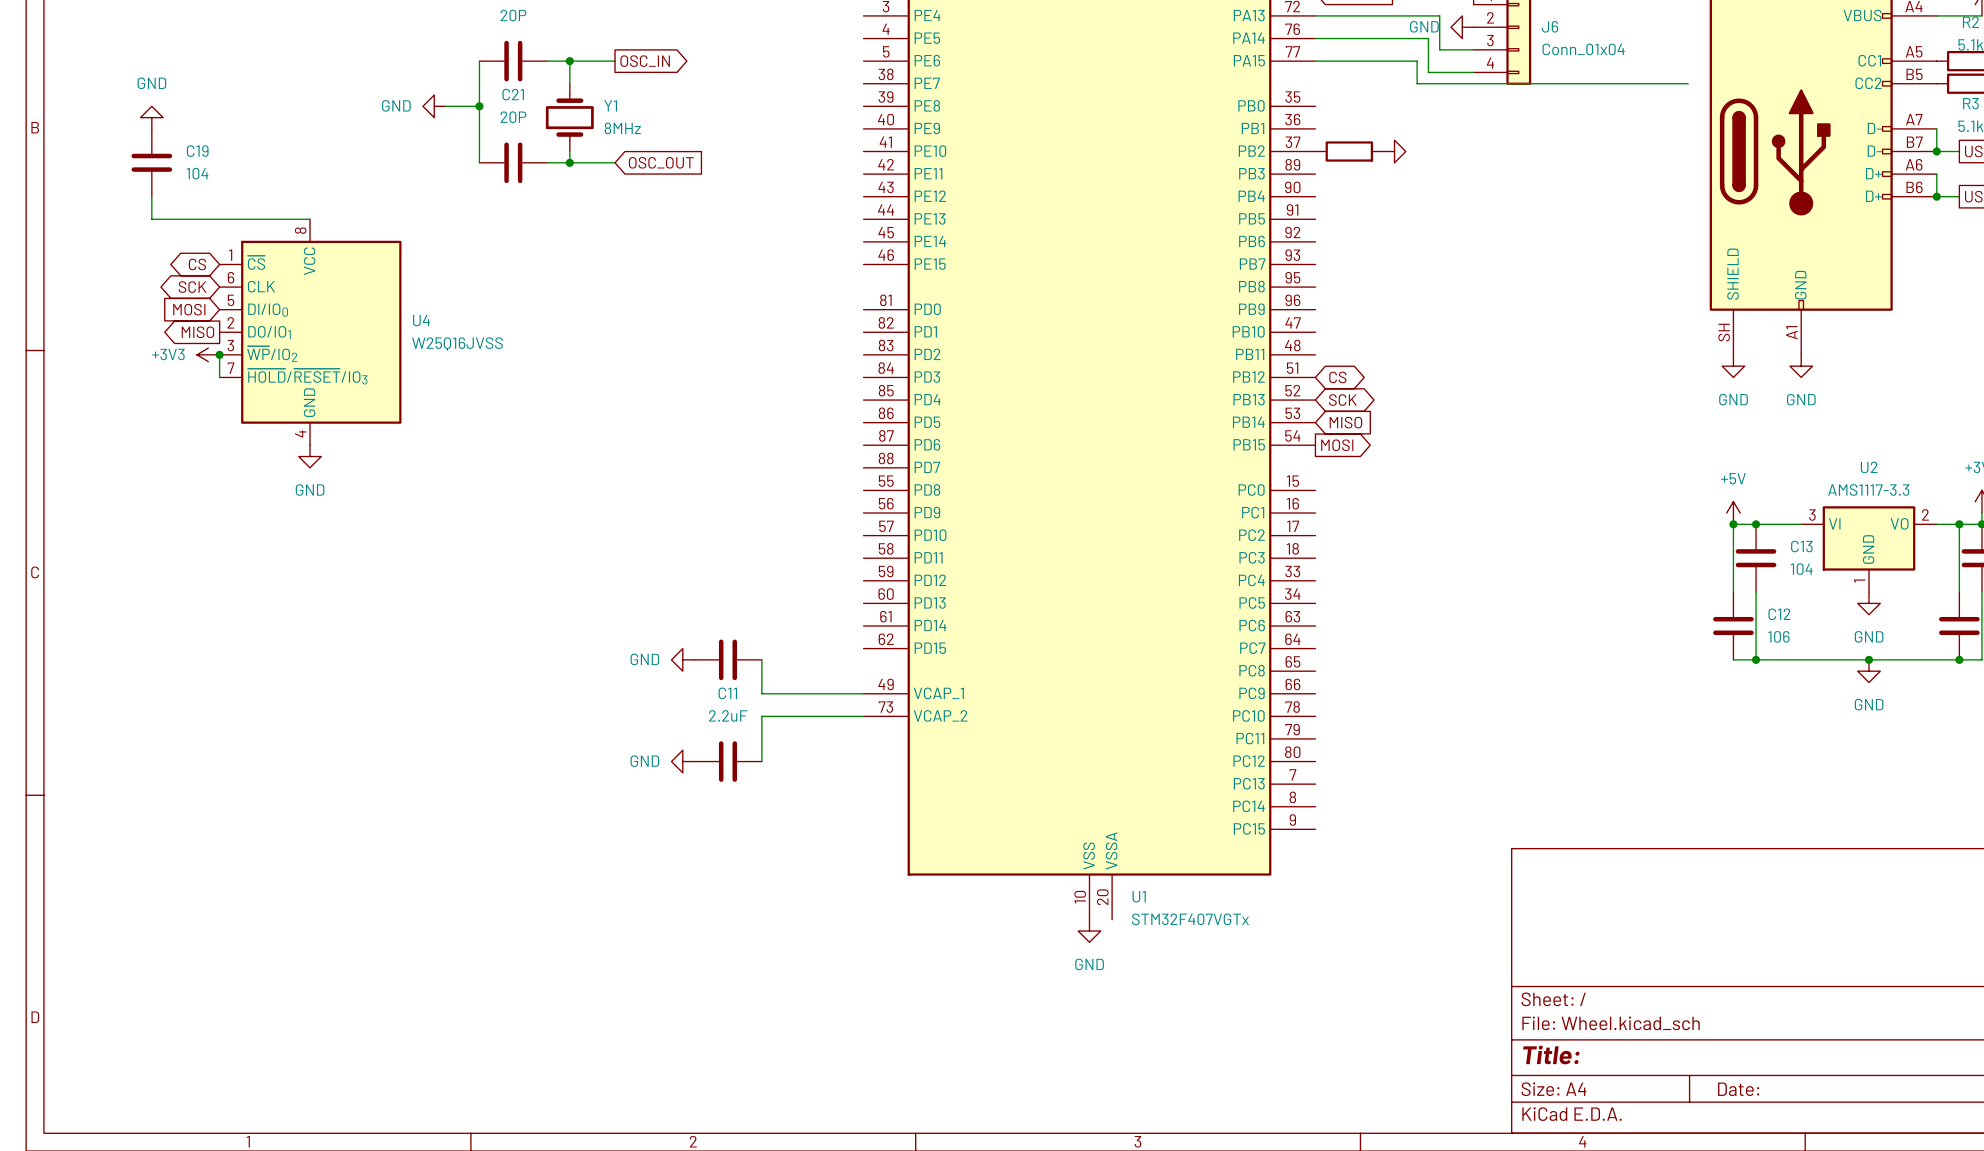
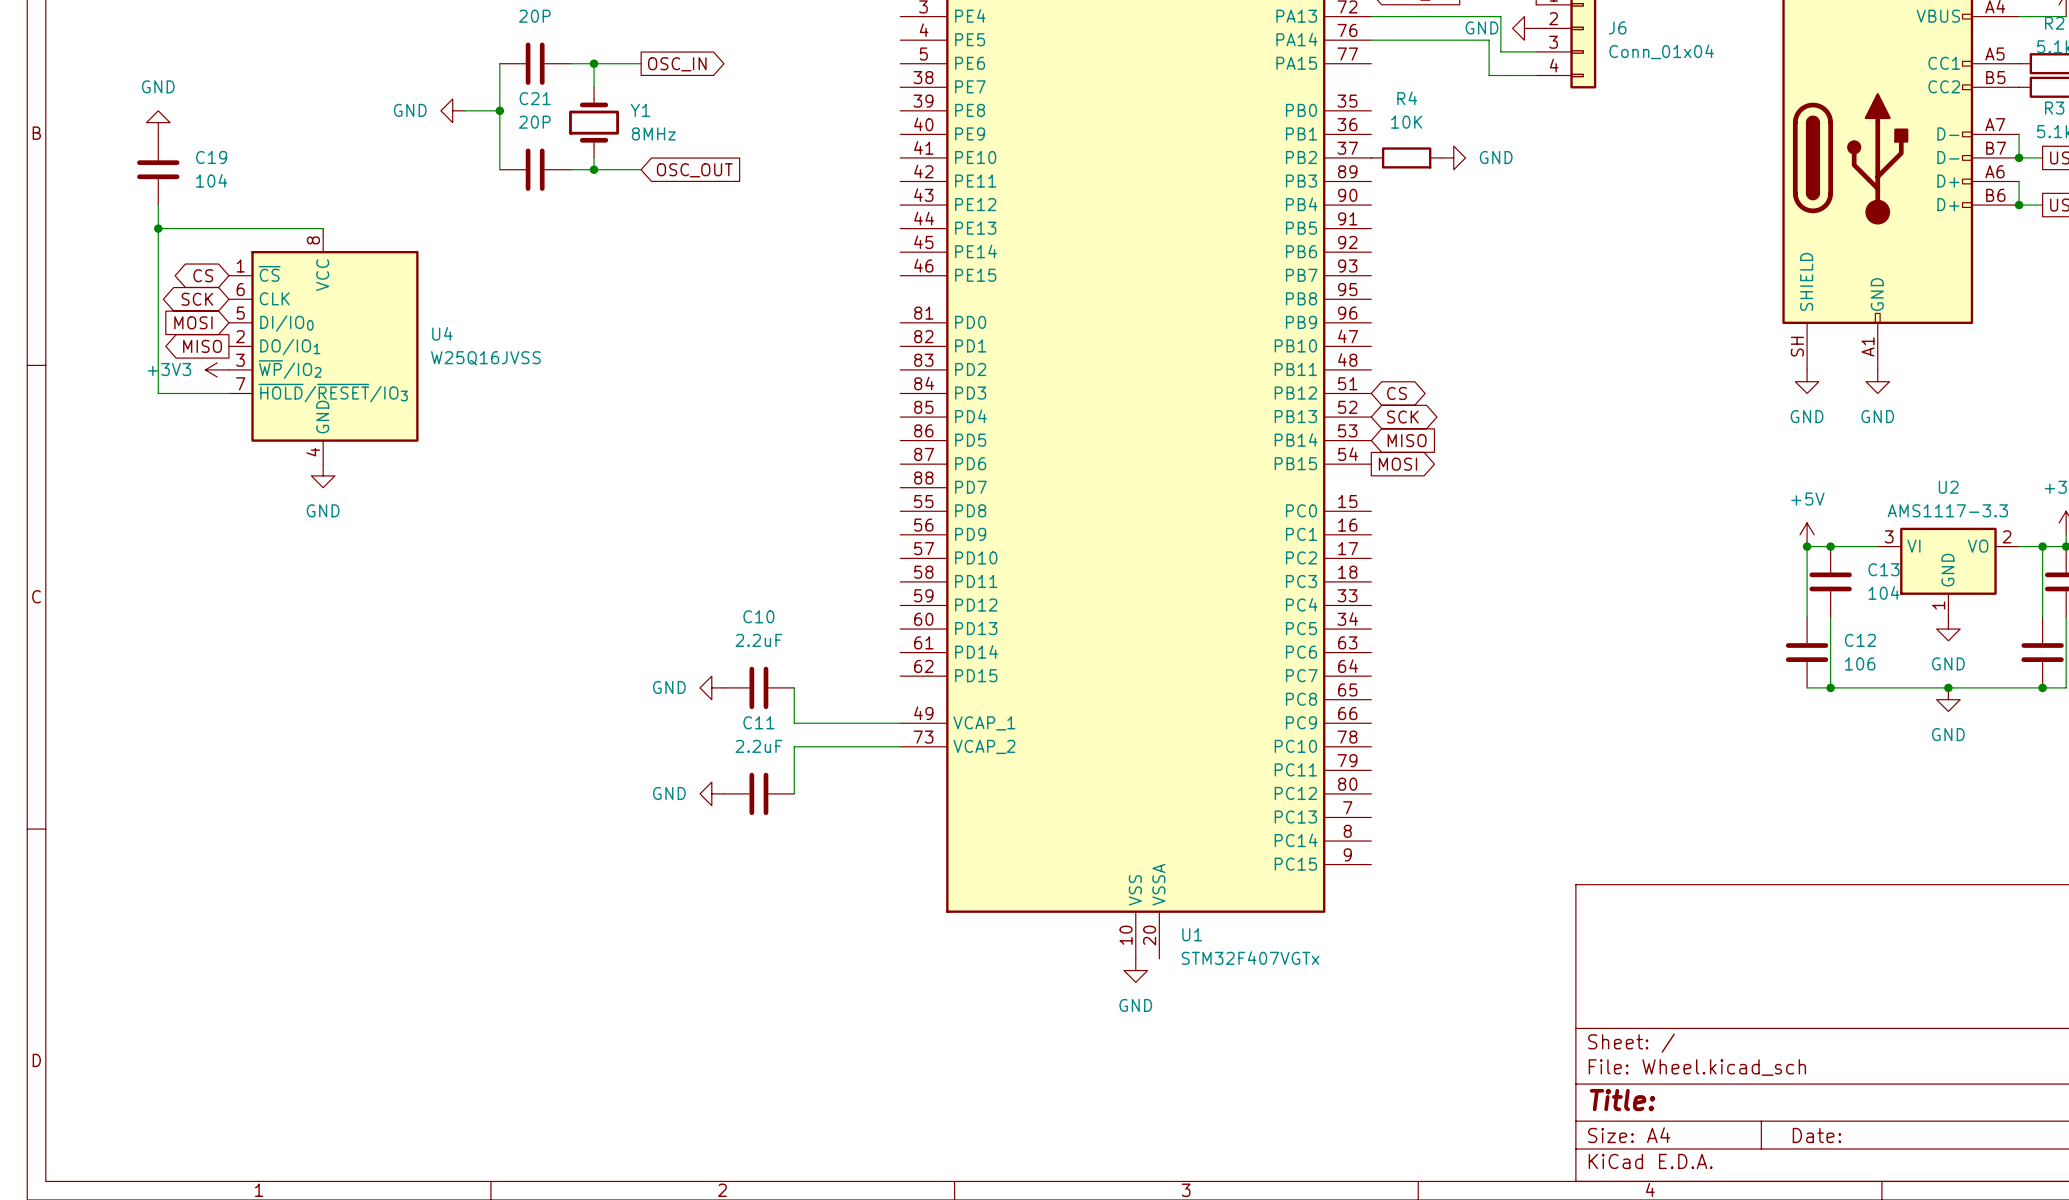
wire: (1315, 61) (1417, 61) (1417, 83) (1688, 83) -> none
R4 name: none -> R4 (1407, 98)
R4 value: none -> 10K (1406, 122)
power symbol text: none -> GND (1496, 157)
junction: none -> (158, 228)
wire: (219, 354) (219, 377) -> (158, 228) (158, 393) (228, 393)
junction: (219, 354) -> none
C10 name: none -> C10 (758, 616)
C10 value: none -> 2.2uF (758, 640)

